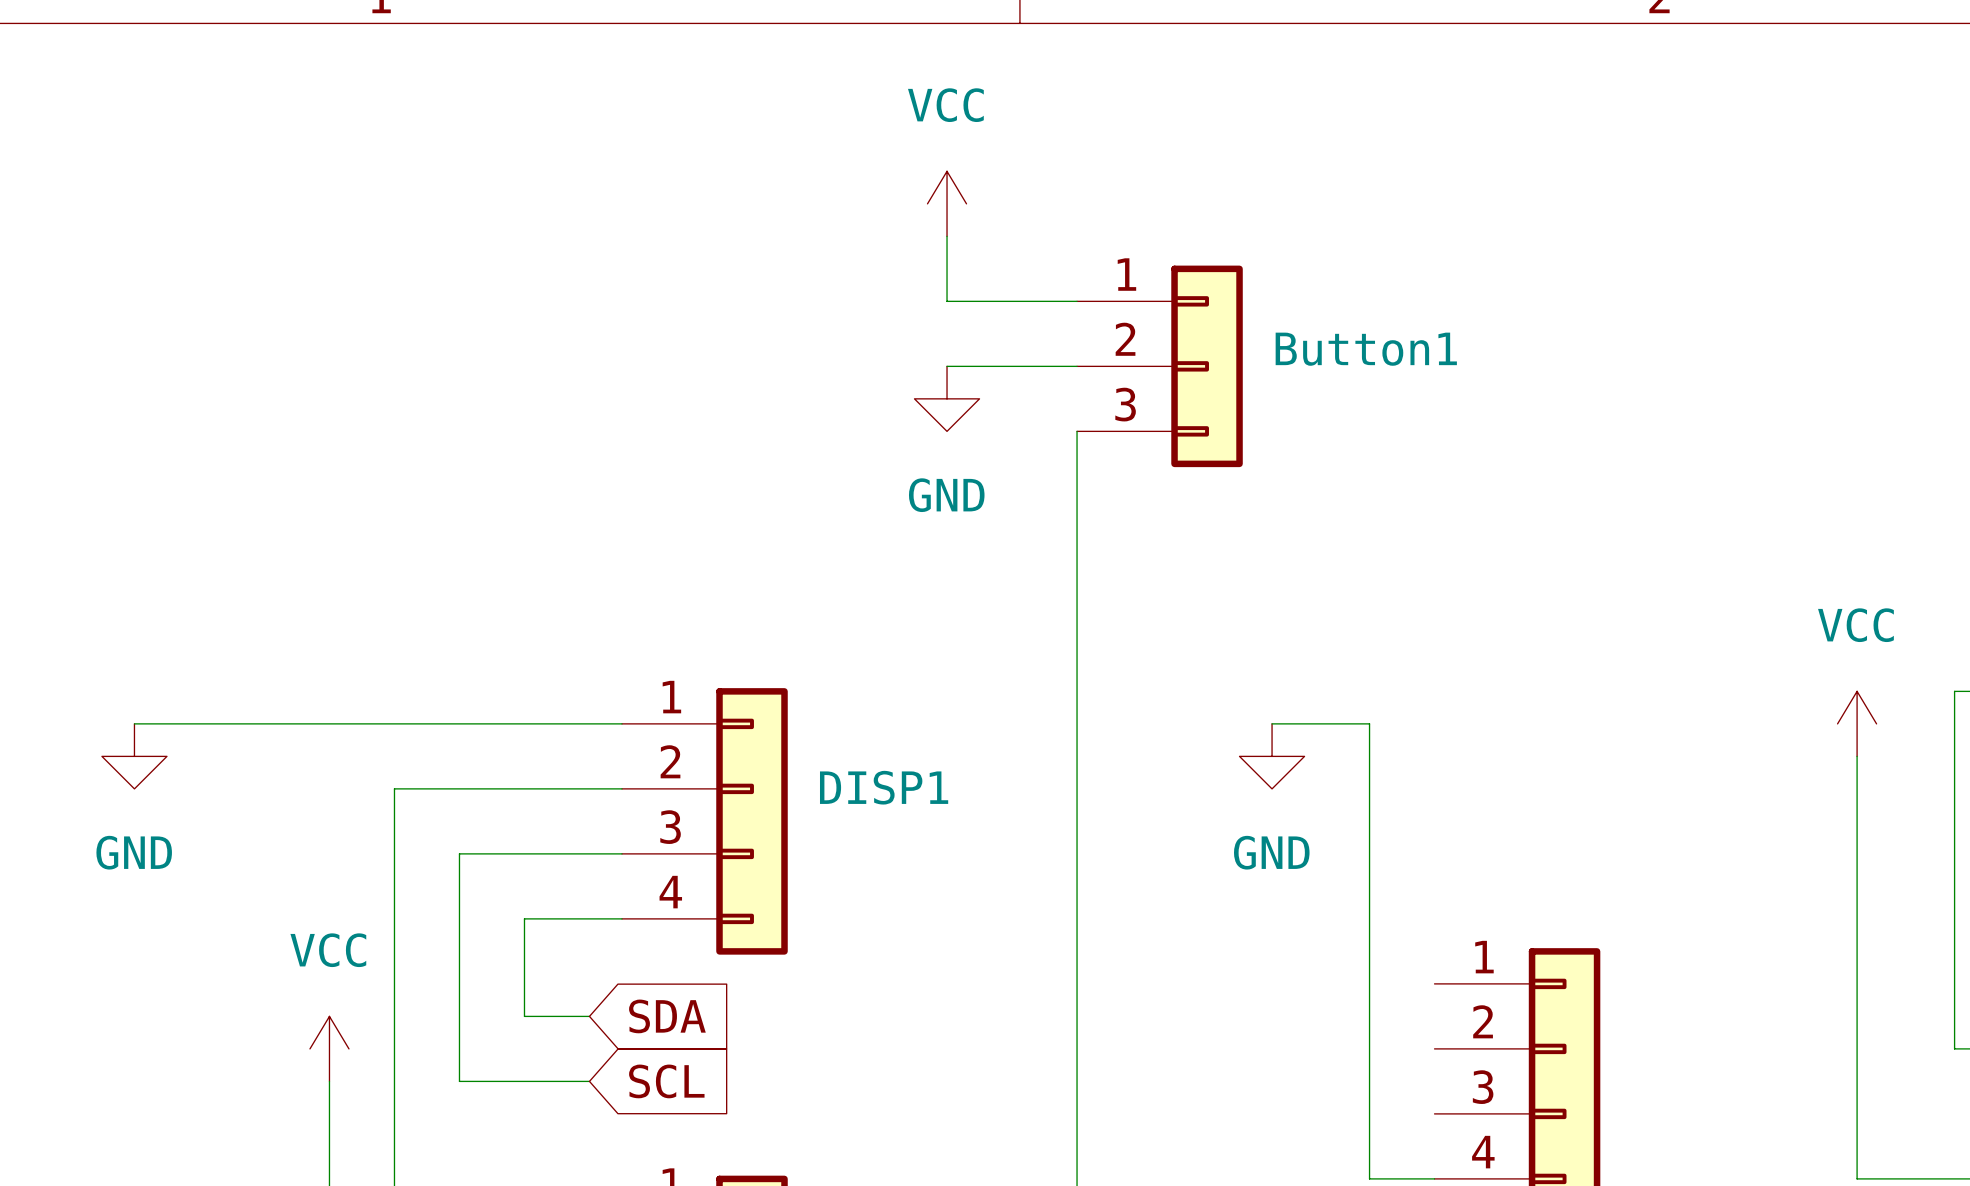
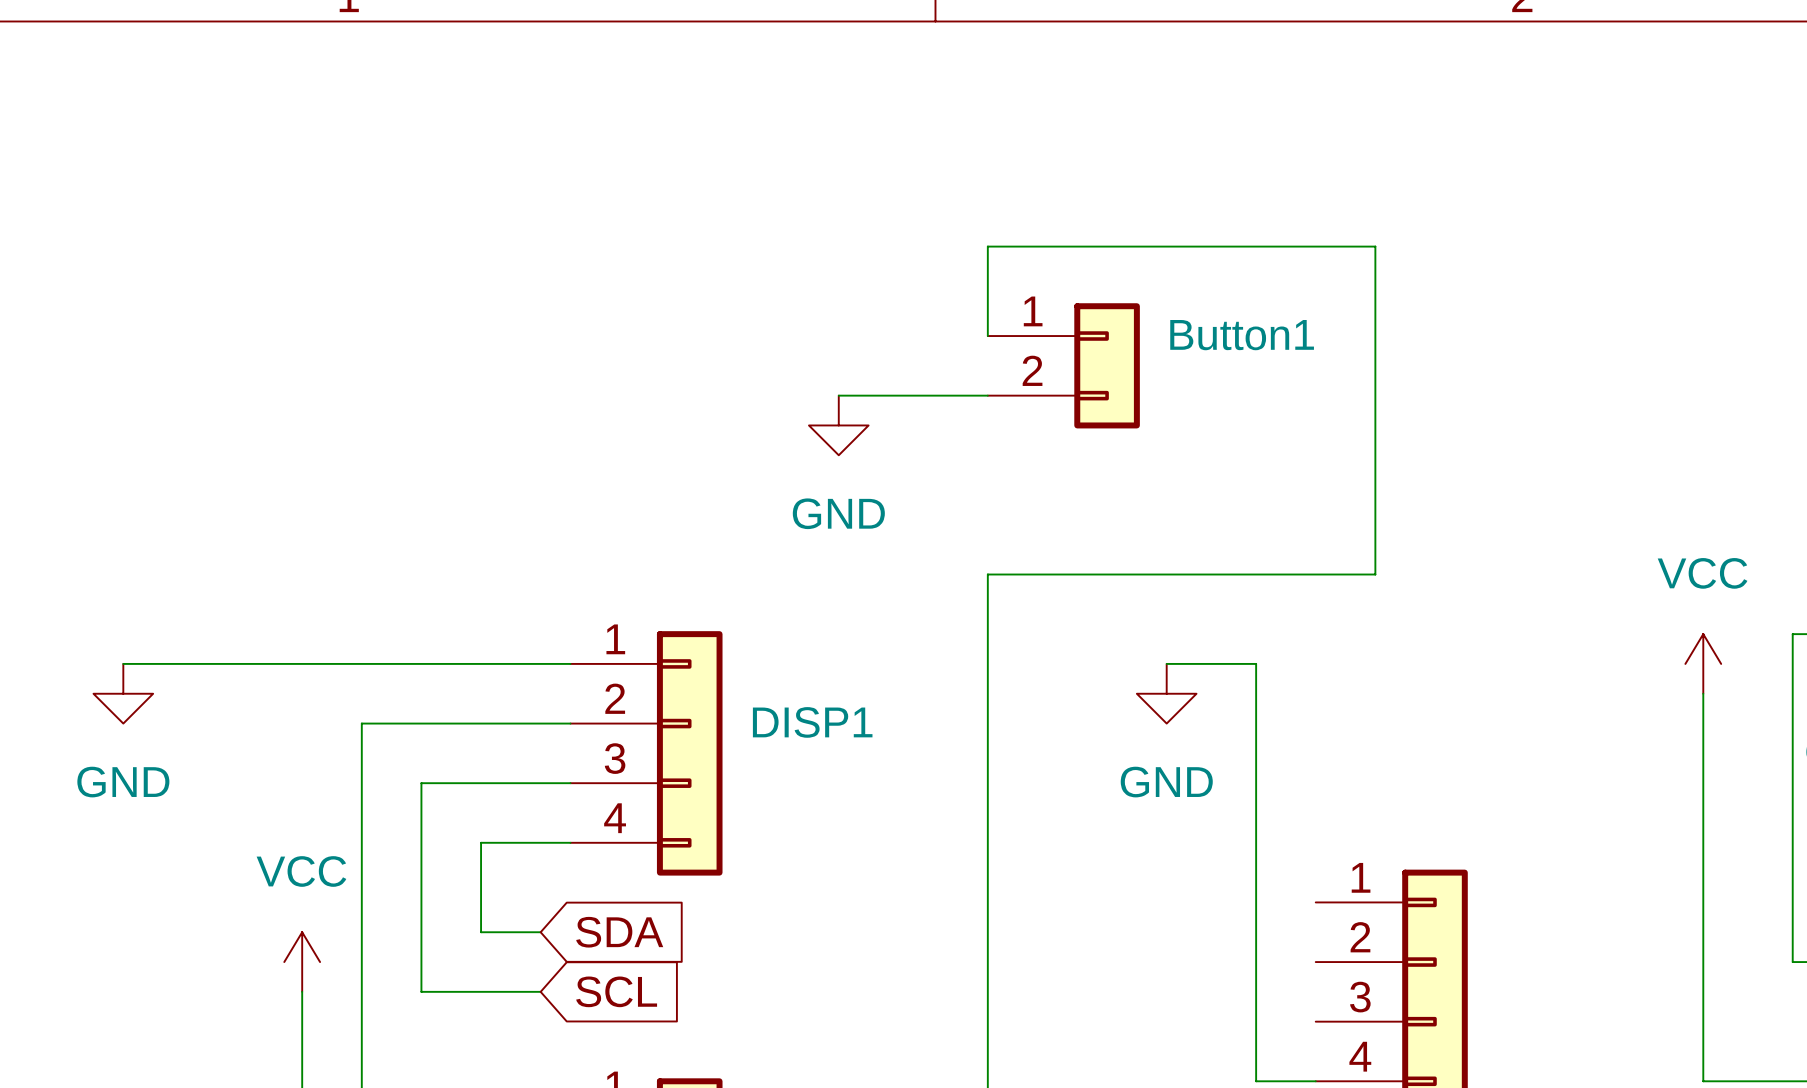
power symbol: VCC (947, 203) -> none
wire: (947, 236) (947, 301) (1077, 301) -> none
Button1 symbol: [1077, 265, 1243, 468] -> [987, 303, 1140, 429]
wire: (947, 366) (1077, 366) -> none
power symbol position: GND (947, 398) -> GND (838, 425)
wire: none -> (838, 395) (987, 395)
wire: (1077, 431) (1077, 626) -> (987, 336) (987, 246) (1375, 246) (1375, 574) (987, 574)

